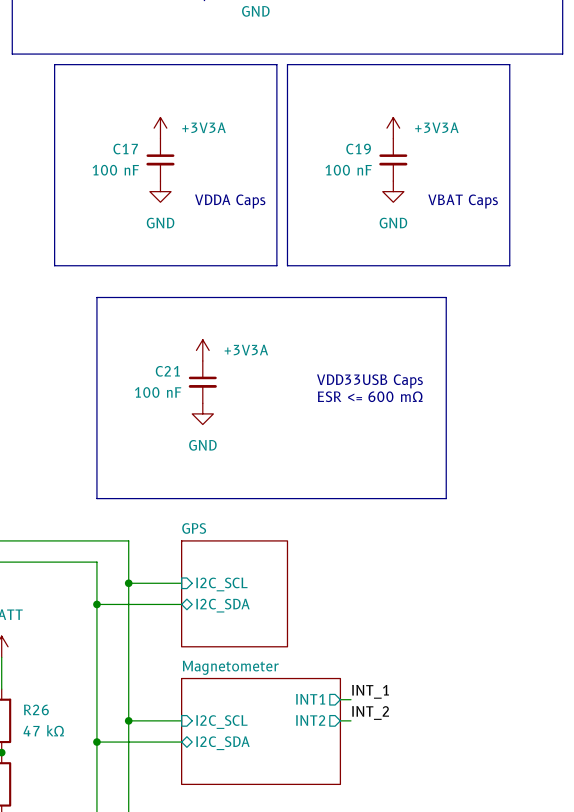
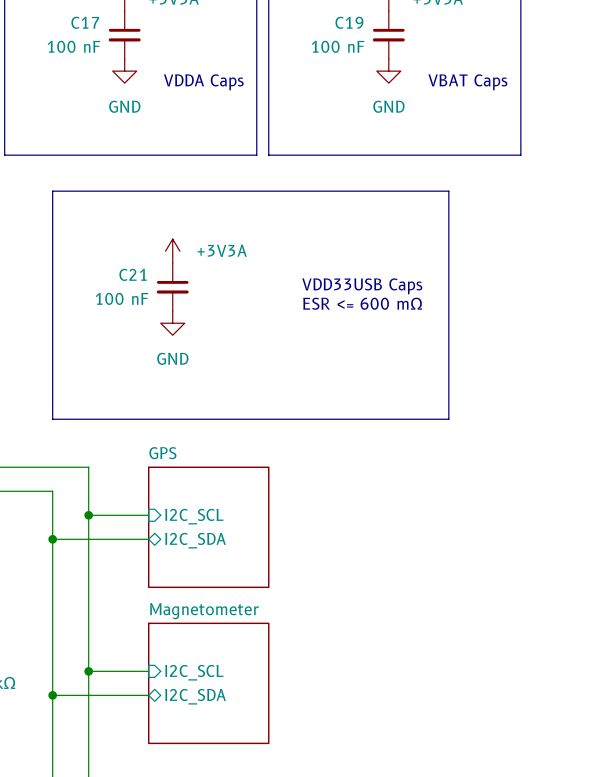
label: INT_1 (370, 691) -> none
sheet pin: INT1 (310, 699) -> none
wire: (340, 699) (350, 699) -> none
label: INT_2 (370, 713) -> none
sheet pin: INT2 (310, 720) -> none
wire: (340, 720) (350, 720) -> none
sheet Magnetometer: none -> (208, 683)
sheet Magnetometer: (261, 731) -> none

